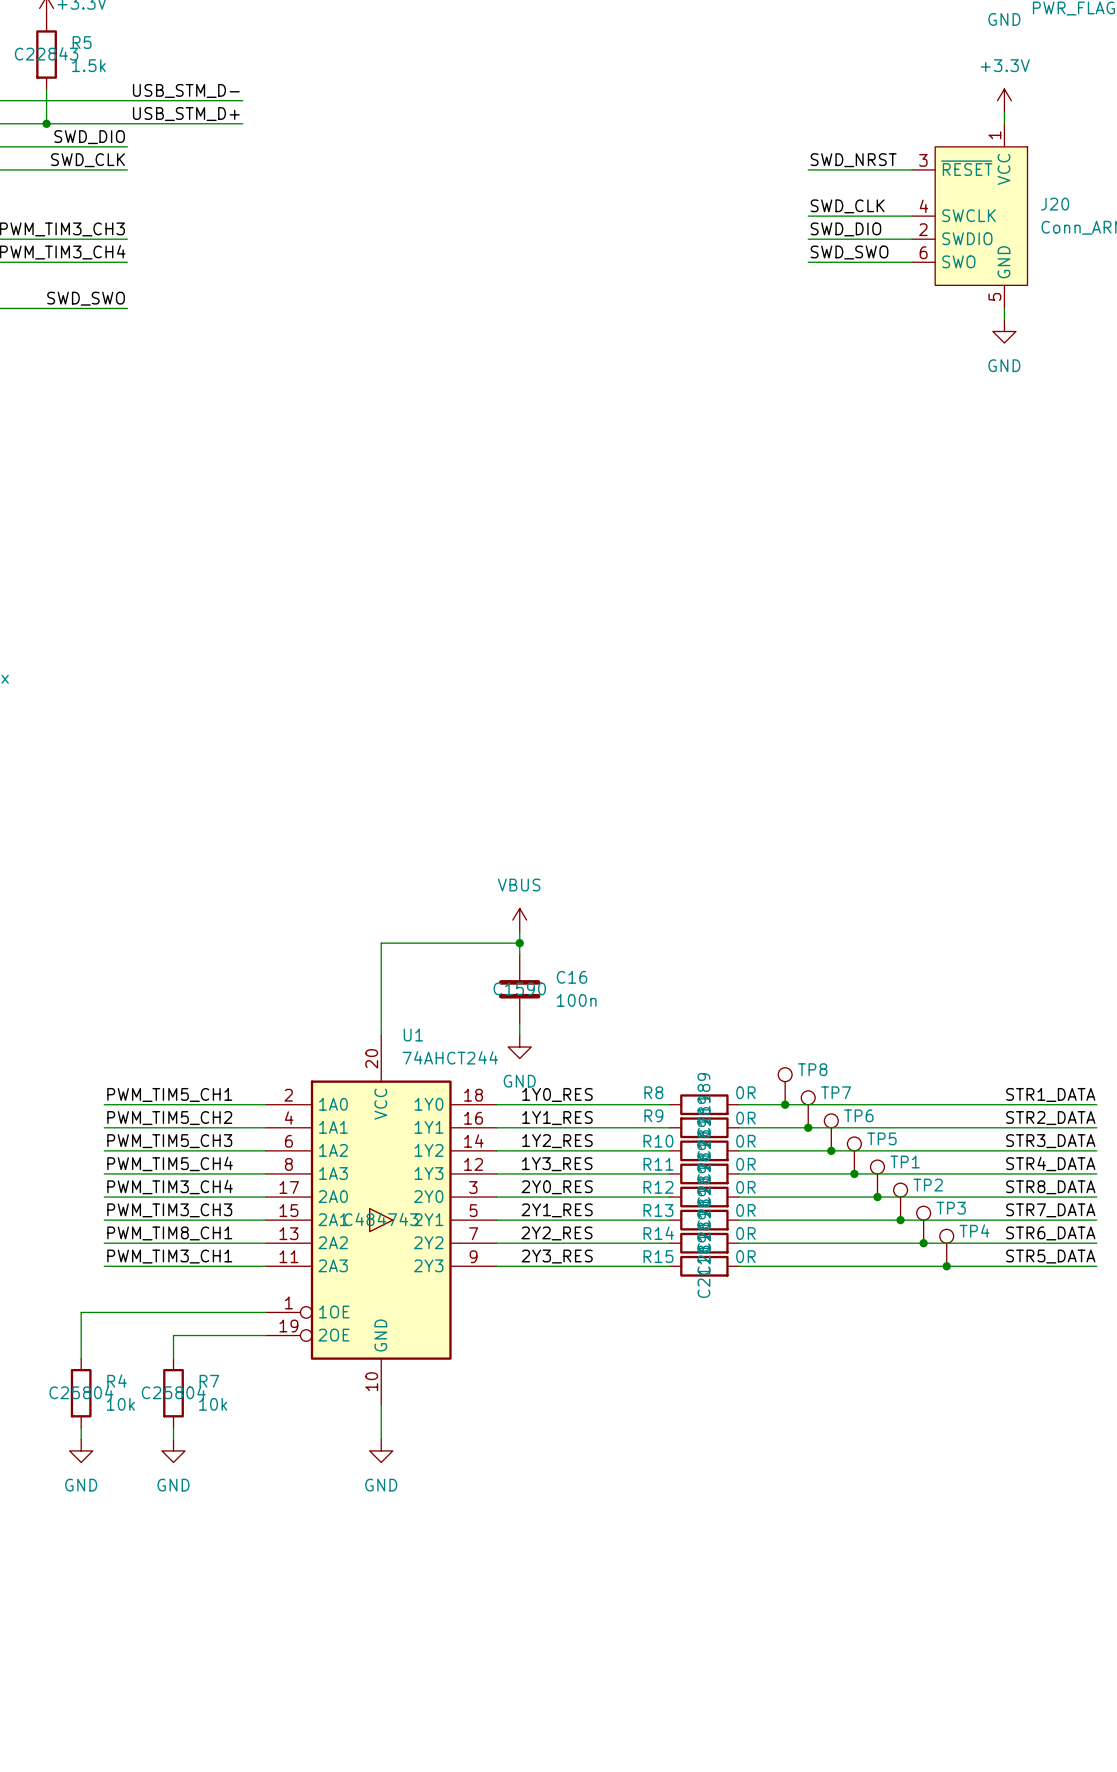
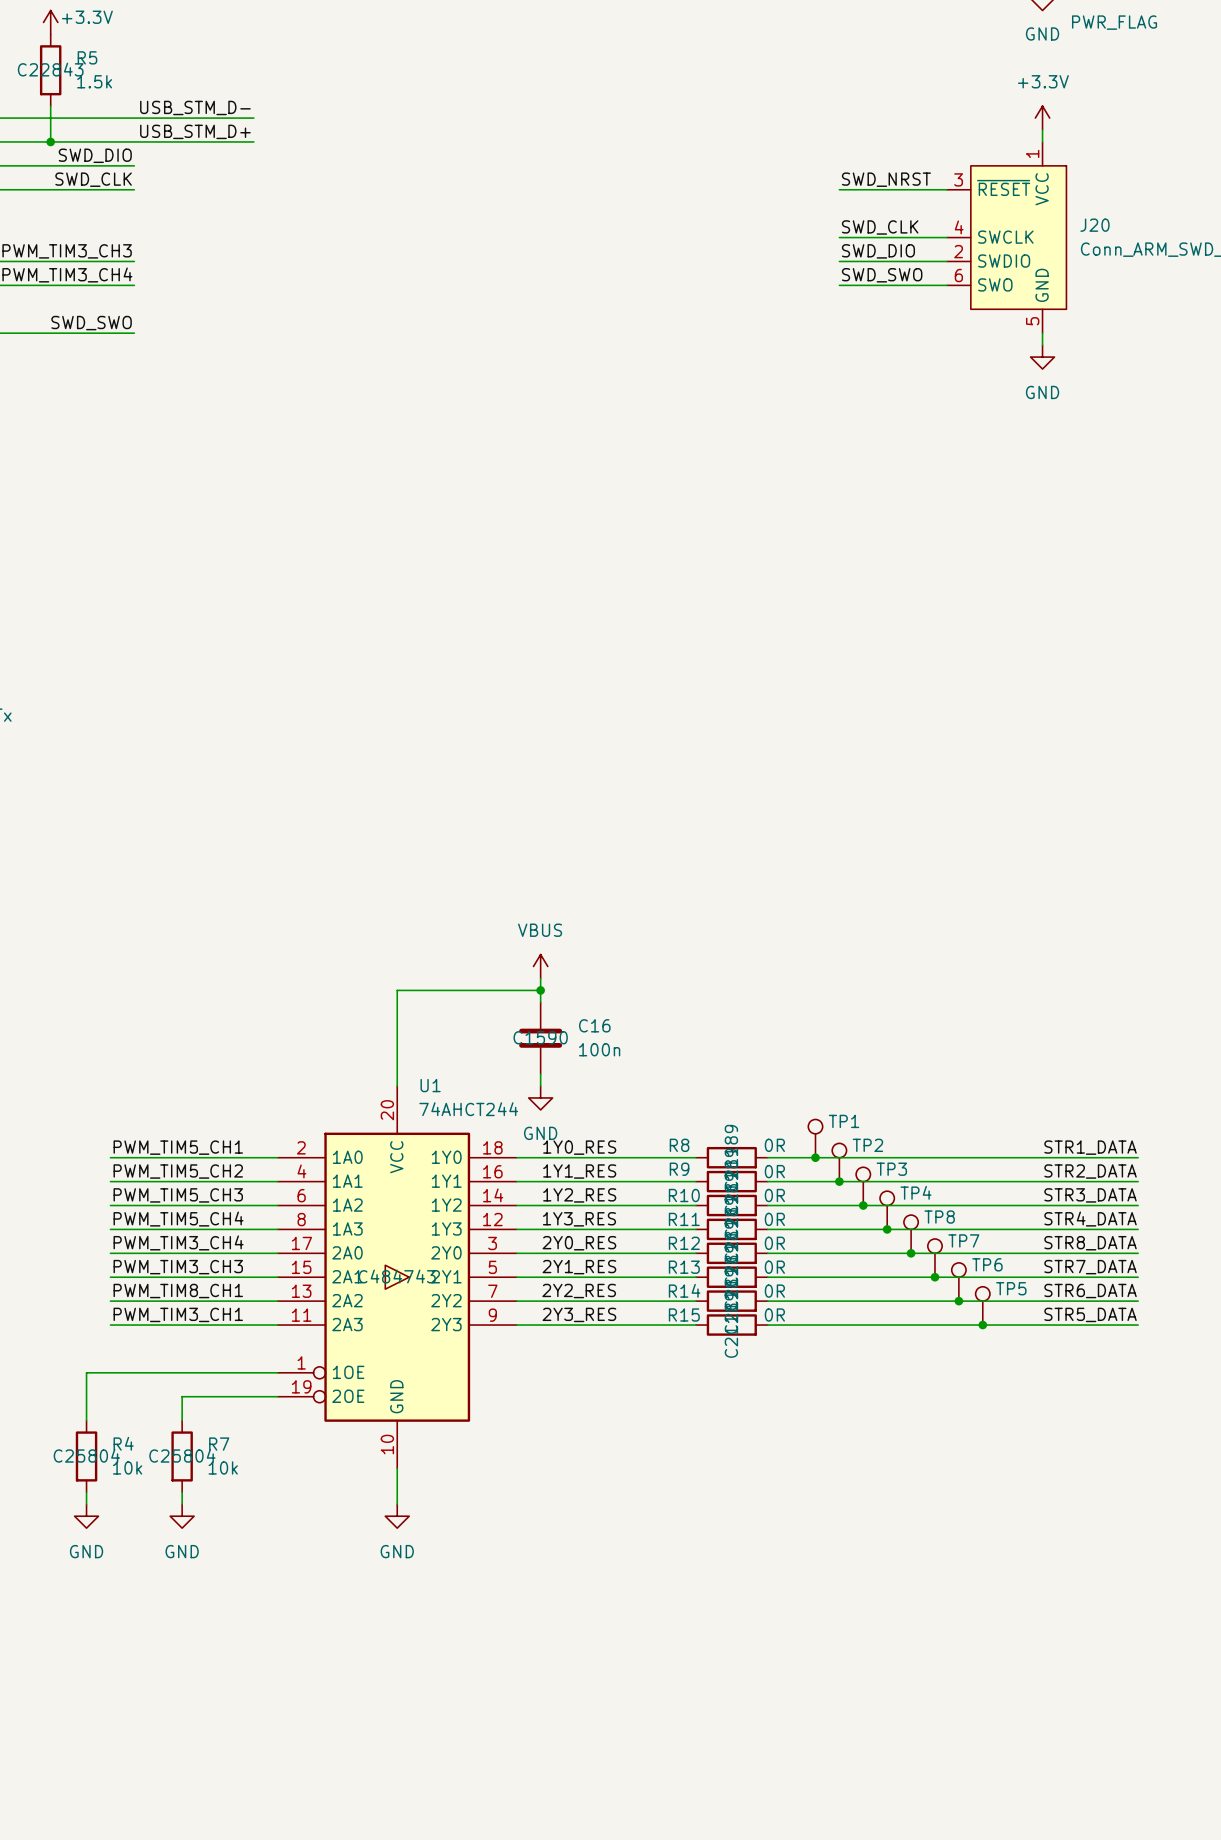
TP8 name: TP8 (812, 1069) -> TP1 (844, 1121)
TP7 name: TP7 (836, 1092) -> TP2 (867, 1145)
TP6 name: TP6 (858, 1115) -> TP3 (891, 1169)
TP5 name: TP5 (881, 1138) -> TP4 (916, 1192)
TP1 name: TP1 (905, 1161) -> TP8 (939, 1217)
TP2 name: TP2 (928, 1185) -> TP7 (963, 1240)
TP3 name: TP3 (951, 1208) -> TP6 (987, 1264)
TP4 name: TP4 (974, 1230) -> TP5 (1011, 1288)

